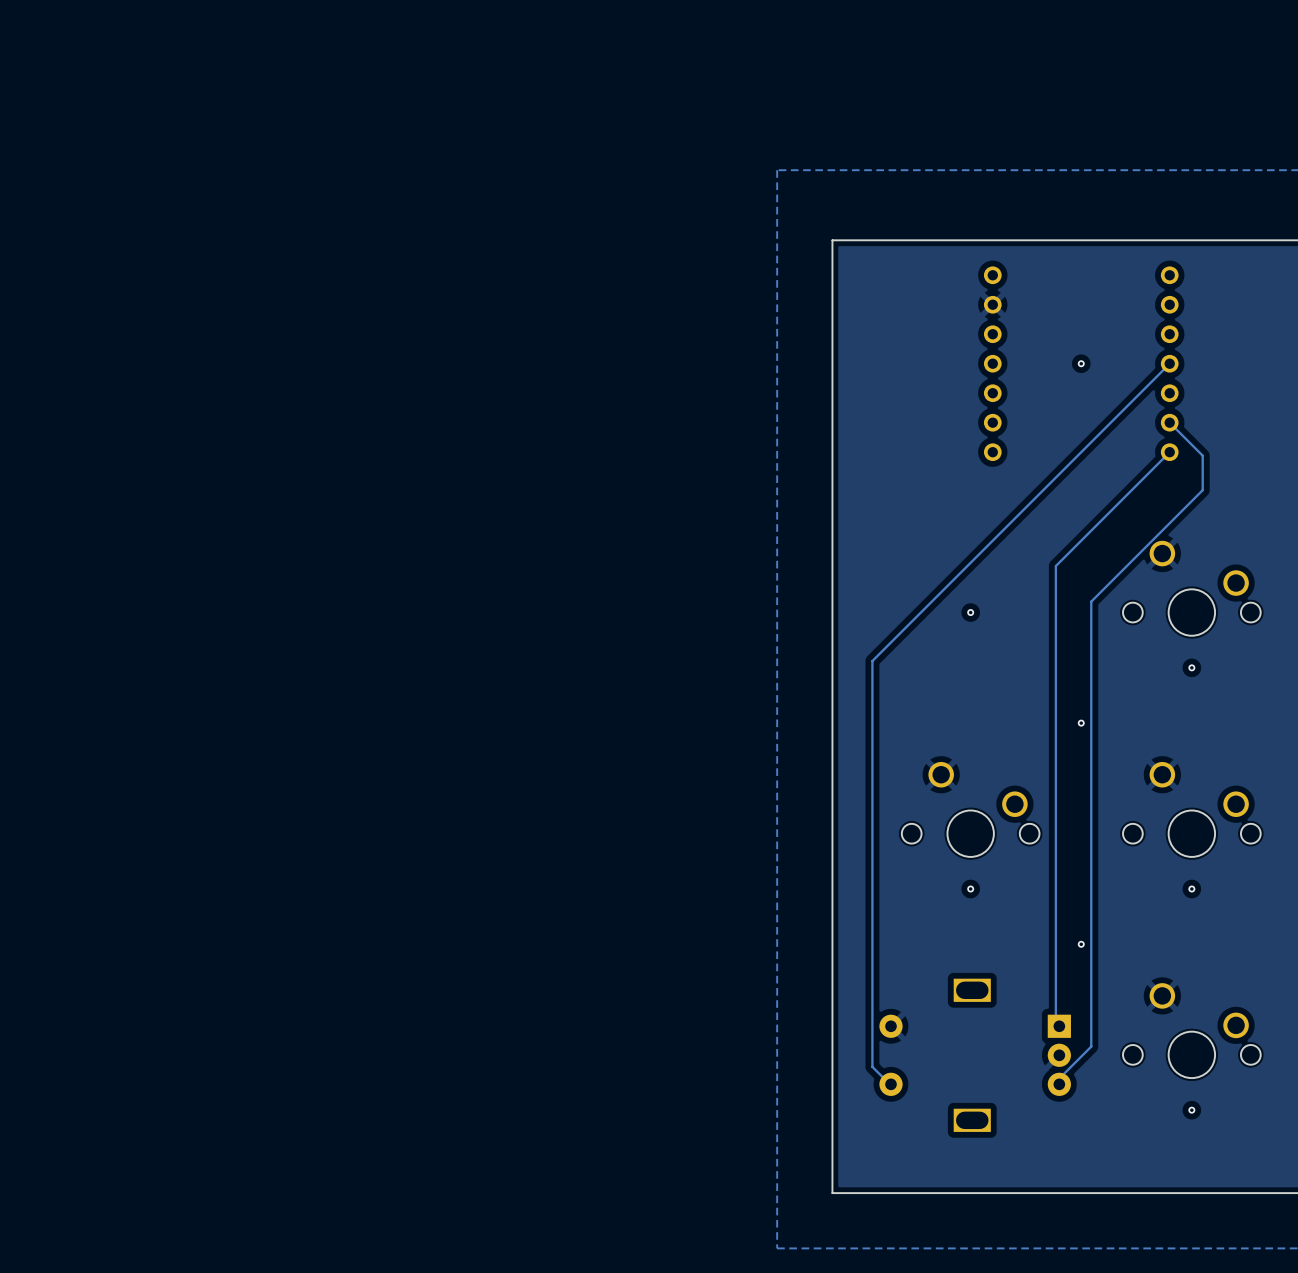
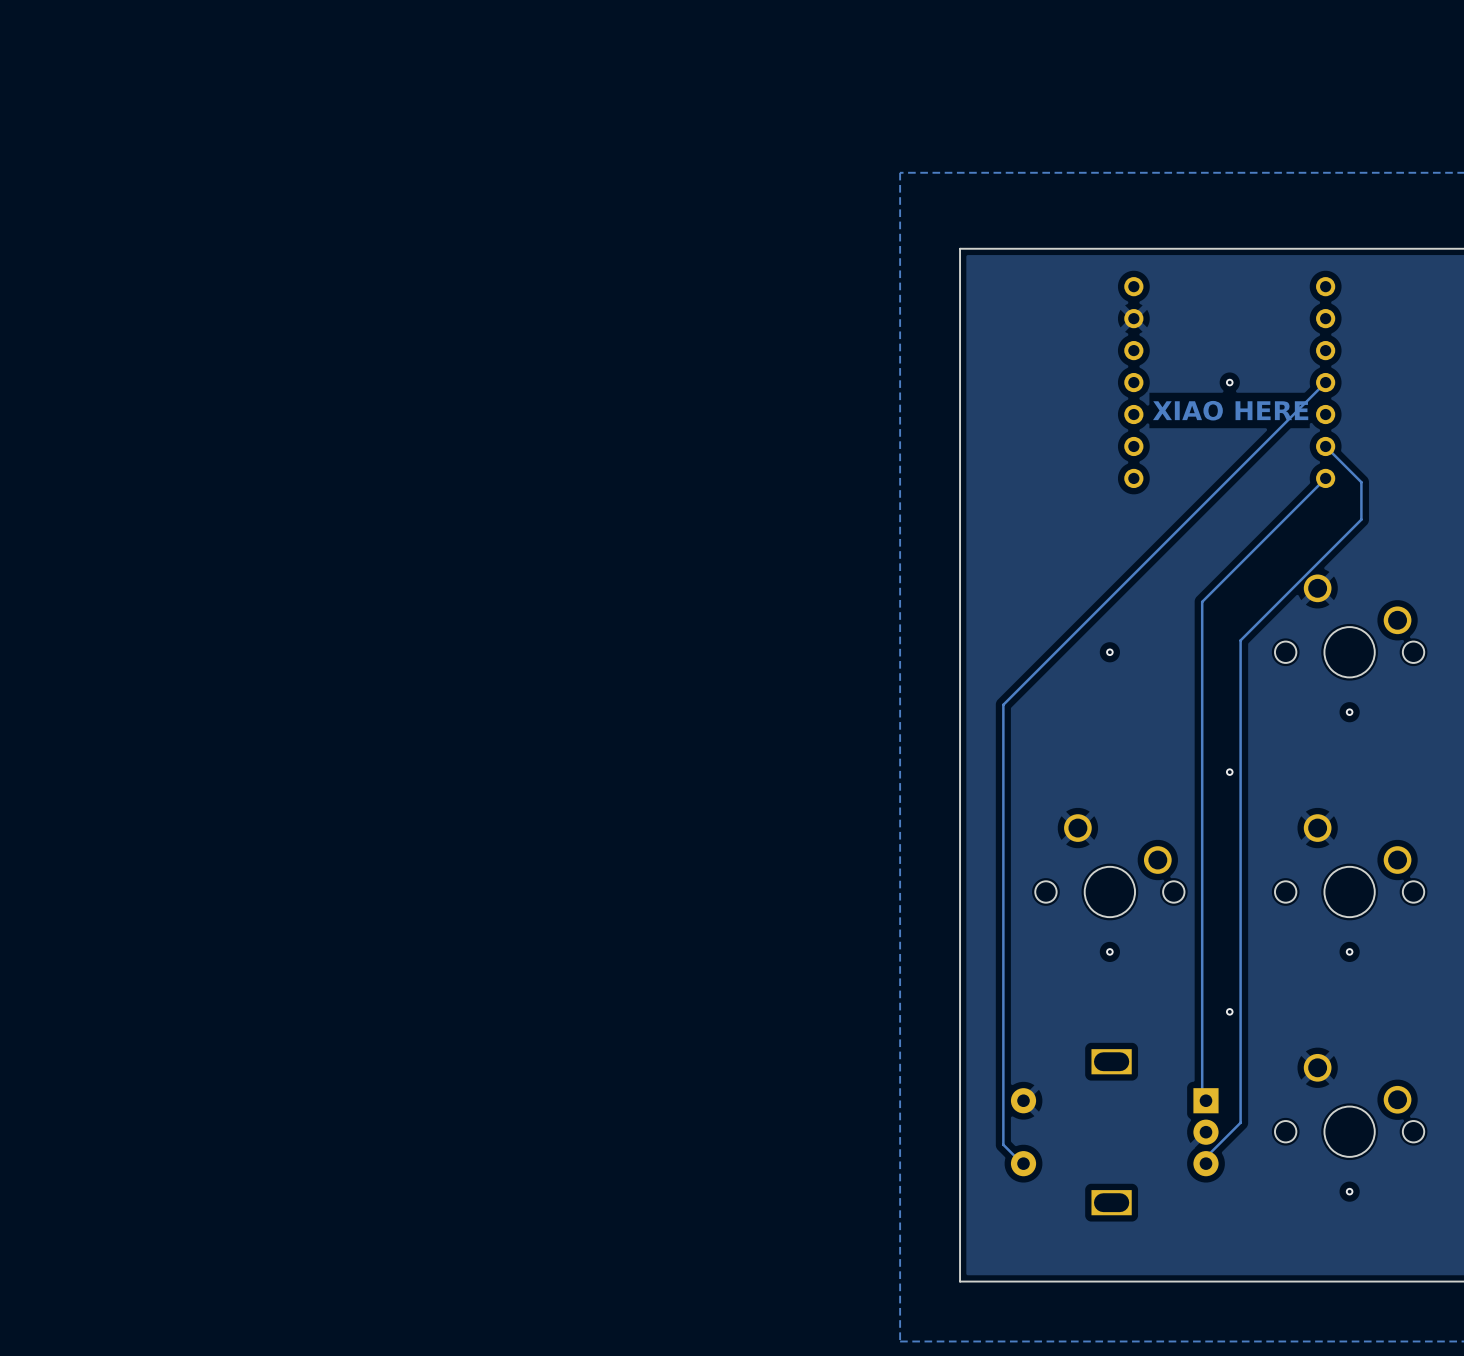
text: none -> XIAO HERE (1230, 410)

